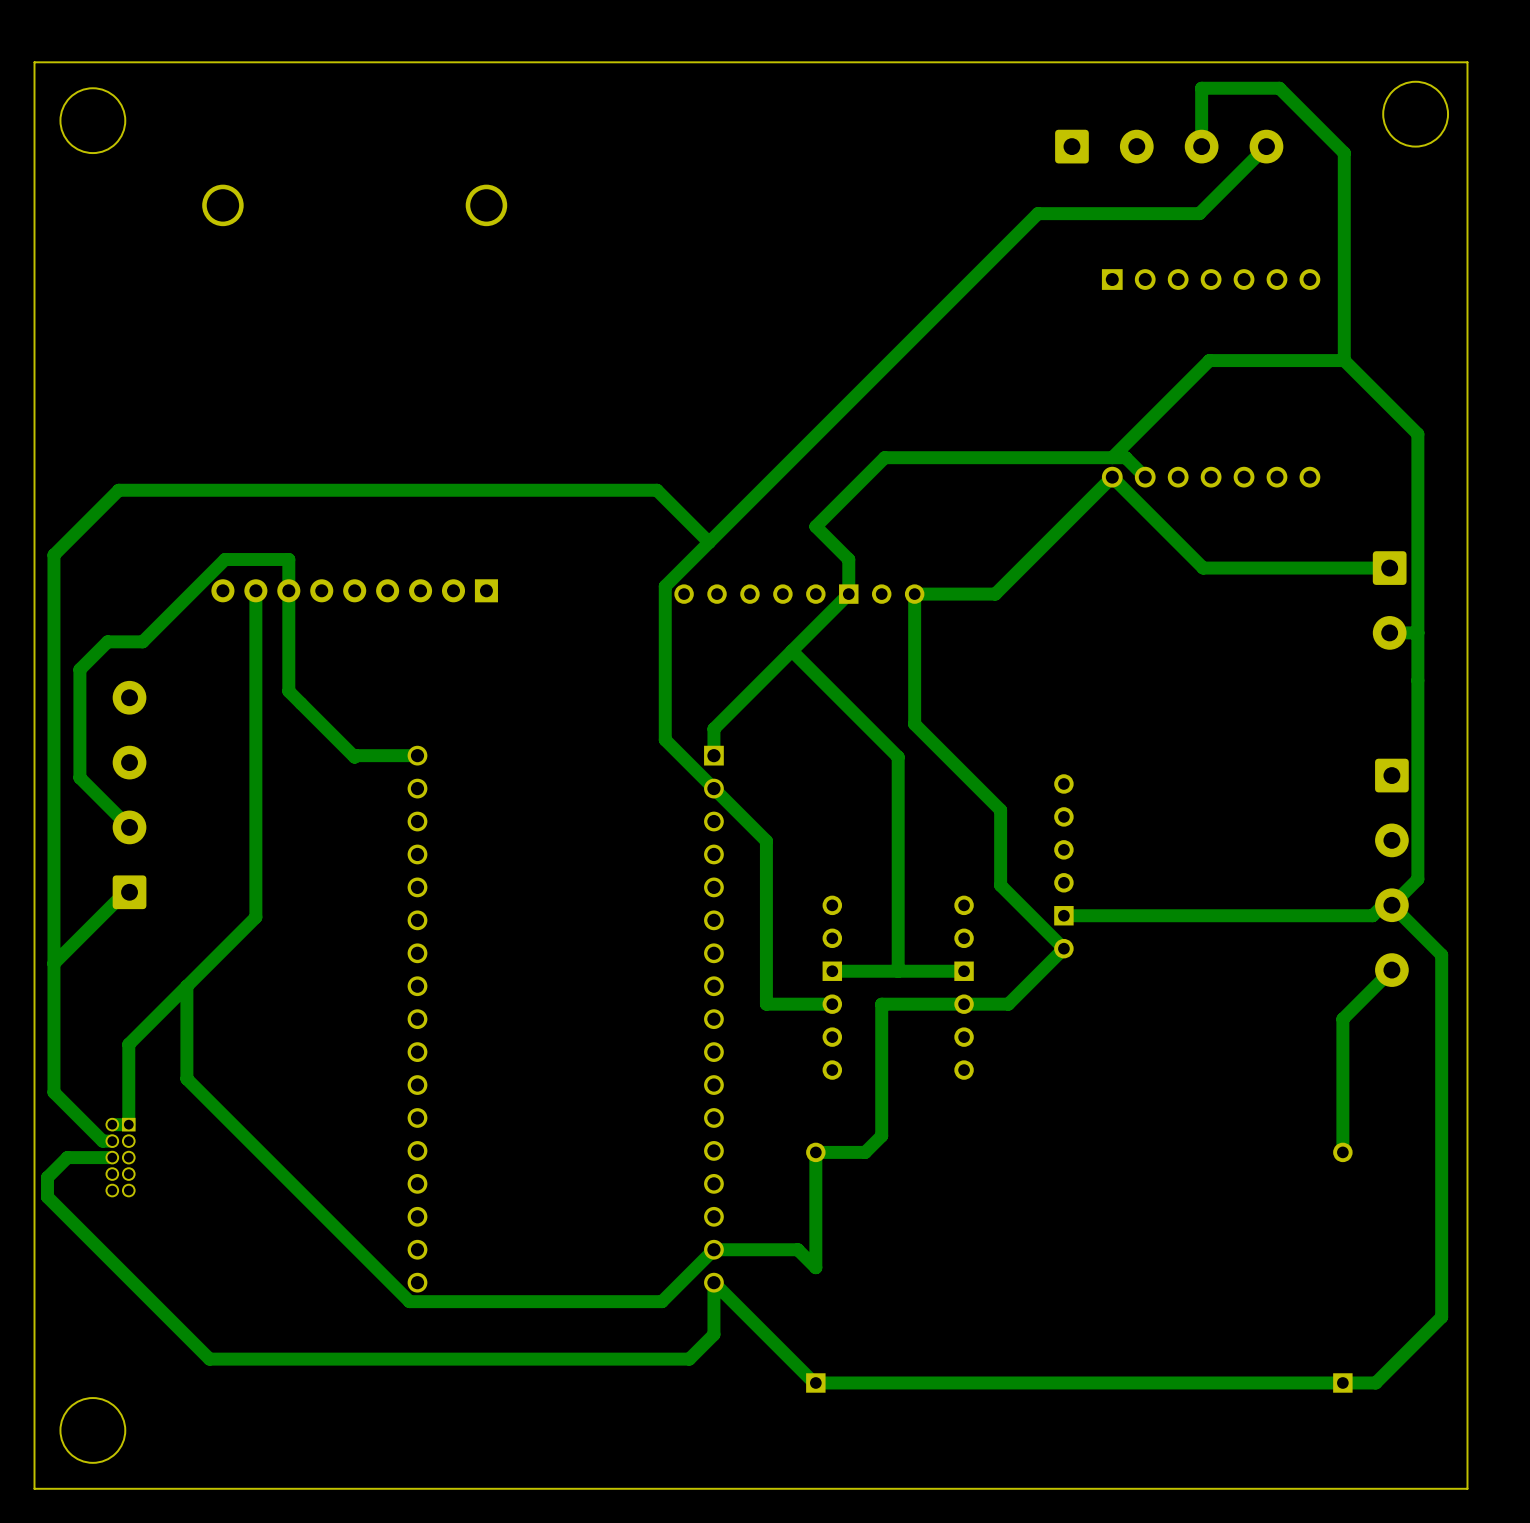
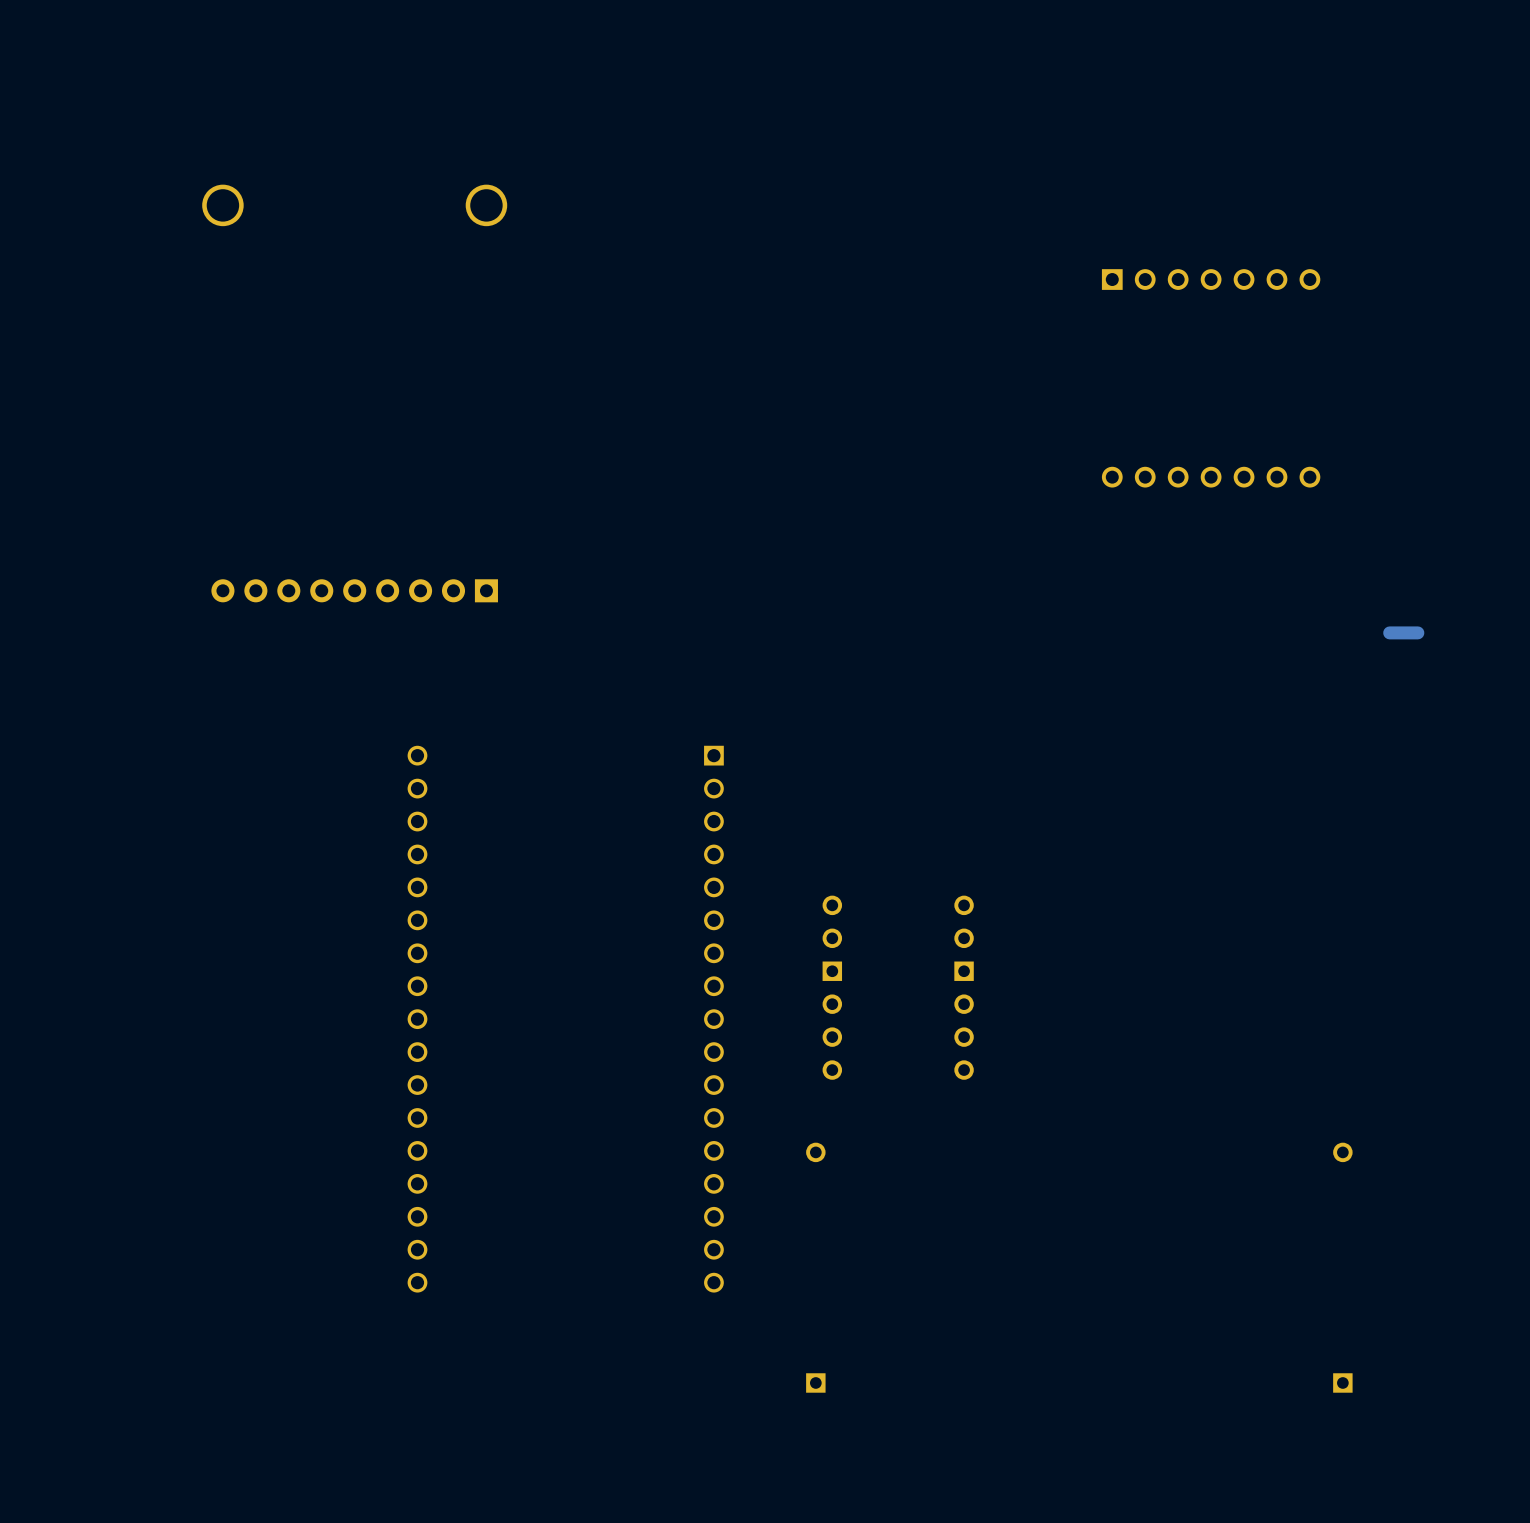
board edge: (1467, 62) (34, 62) (34, 1488) (1467, 1488) (1467, 62) -> none
round board edge: [1382, 81, 1449, 147] -> none
round board edge: [60, 87, 126, 154] -> none
part: (1169, 146) -> none
track: (1201, 146) (1201, 88) (1279, 88) (1344, 153) (1344, 360) -> none
track: (1266, 146) (1199, 213) (1037, 213) (665, 586) (665, 739) (766, 841) (766, 1004) (832, 1004) -> none
track: (1344, 360) (1209, 360) (1112, 457) -> none
track: (1344, 360) (1417, 434) (1417, 879) (1391, 905) -> none
track: (1145, 479) (1125, 457) (884, 457) (815, 526) (848, 559) (848, 594) (713, 728) (713, 755) -> none
track: (709, 542) (656, 490) (118, 490) (53, 555) (53, 1092) (102, 1141) (112, 1141) -> none
track: (1389, 568) (1203, 568) (1112, 477) (995, 594) (914, 594) (914, 724) (1000, 810) (1000, 885) (1063, 948) (1008, 1004) (881, 1004) (881, 1135) (865, 1152) (815, 1152) (815, 1267) (797, 1249) (713, 1249) (662, 1301) (409, 1301) (186, 1078) (186, 986) -> none
track: (255, 590) (255, 917) (128, 1044) (128, 1124) (112, 1124) -> none
part: (799, 594) -> none
part: (1389, 600) -> none
track: (791, 650) (898, 757) (898, 971) -> none
track: (417, 755) (354, 757) (288, 691) (288, 559) (225, 559) (142, 641) (107, 641) (79, 669) (79, 777) (129, 827) -> none
part: (129, 795) -> none
part: (1063, 866) -> none
part: (1391, 872) -> none
track: (129, 892) (125, 892) (53, 963) -> none
track: (1391, 905) (1383, 905) (1372, 915) (1063, 915) -> none
track: (1391, 905) (1441, 955) (1441, 1317) (1375, 1382) (814, 1382) (713, 1282) (713, 1334) (689, 1359) (209, 1359) (47, 1197) (47, 1177) (67, 1157) (112, 1157) -> none
track: (1391, 970) (1342, 1019) (1342, 1152) -> none
track: (964, 971) (832, 971) -> none
part: (120, 1157) -> none
round board edge: [60, 1397, 126, 1464] -> none

